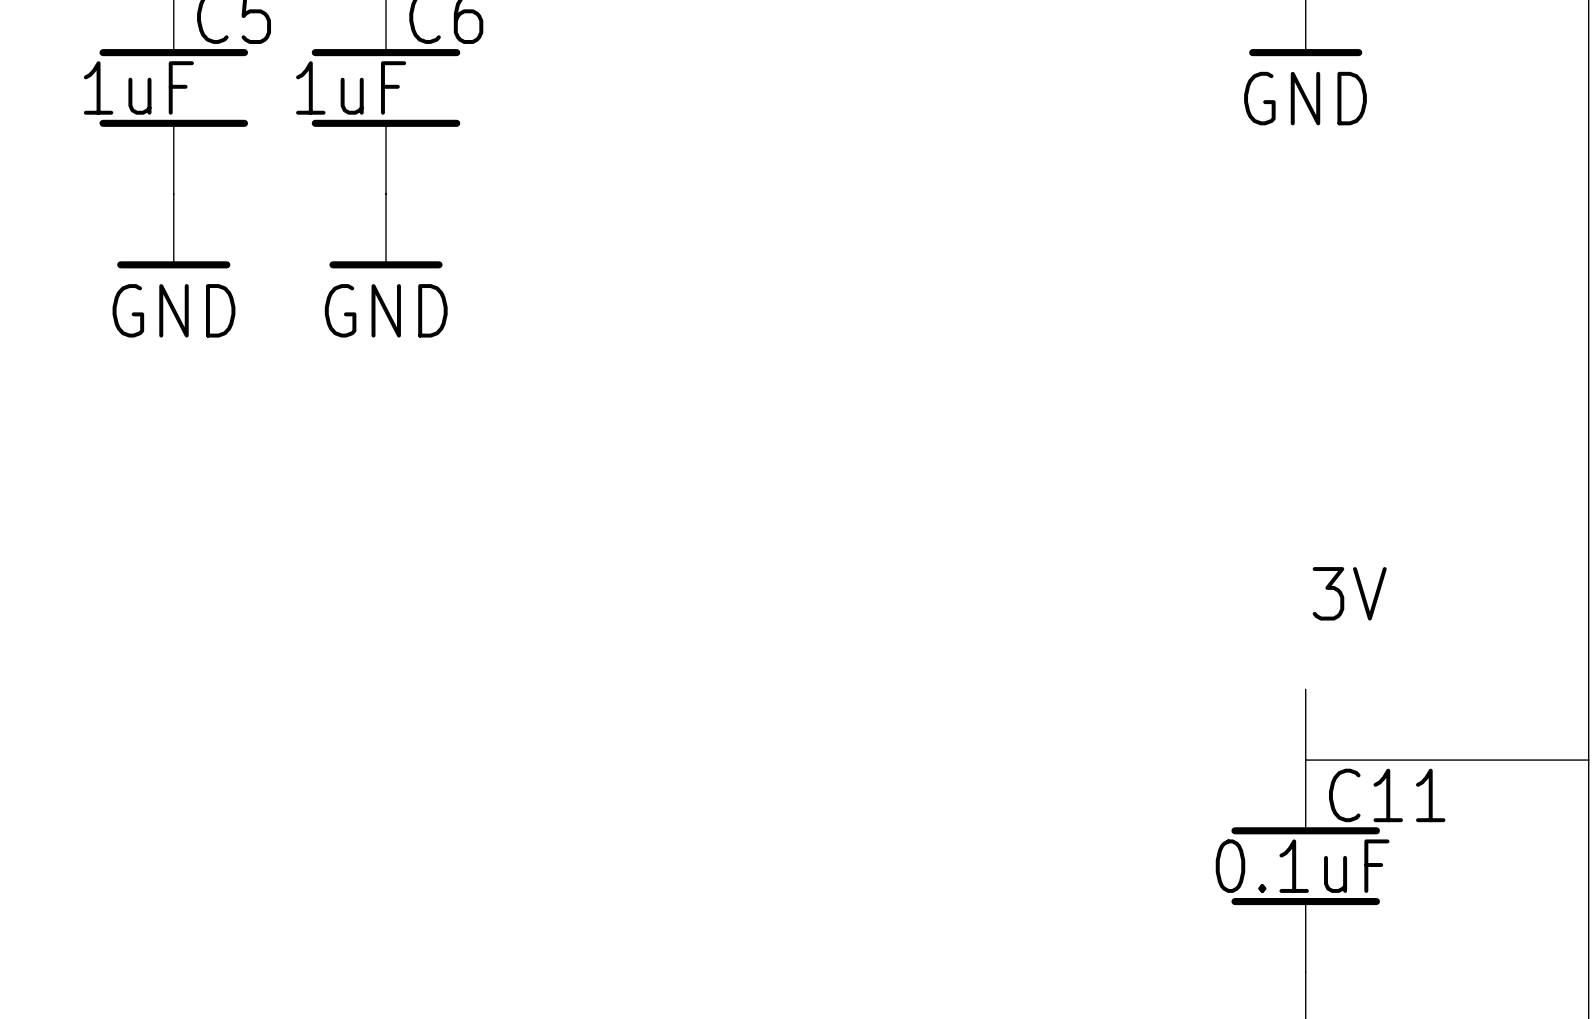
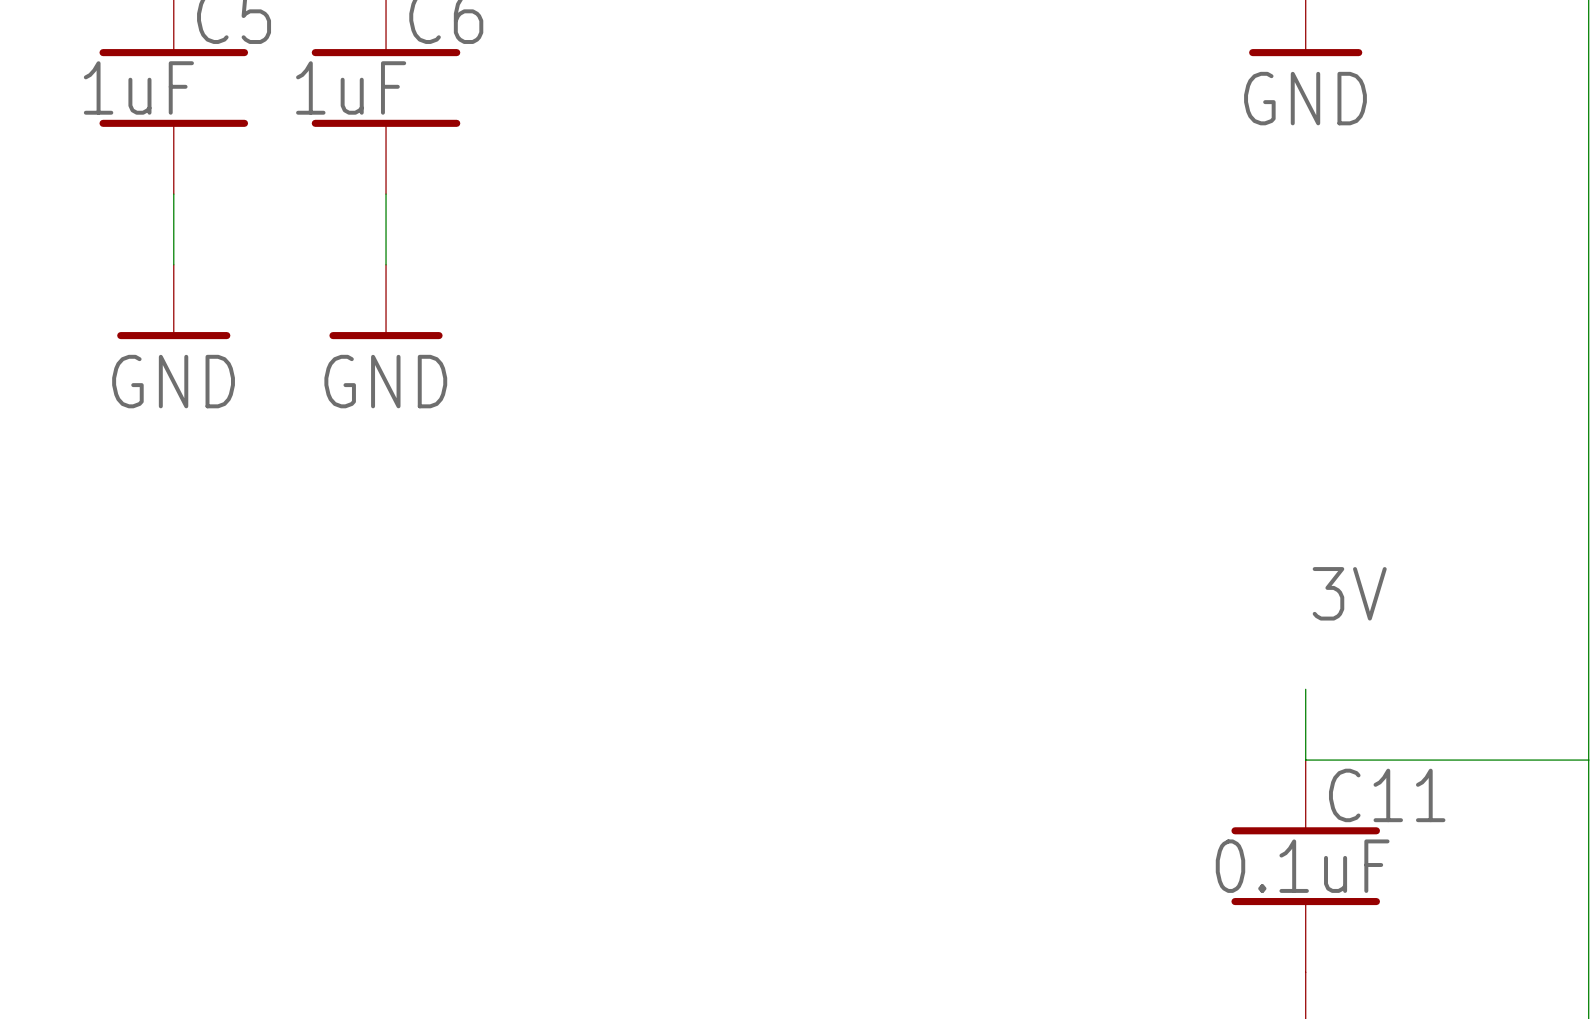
power symbol position: GND (173, 231) -> GND (173, 301)
power symbol position: GND (386, 231) -> GND (386, 301)
power symbol text position: GND (174, 310) -> GND (173, 381)
power symbol text position: GND (386, 310) -> GND (385, 381)

